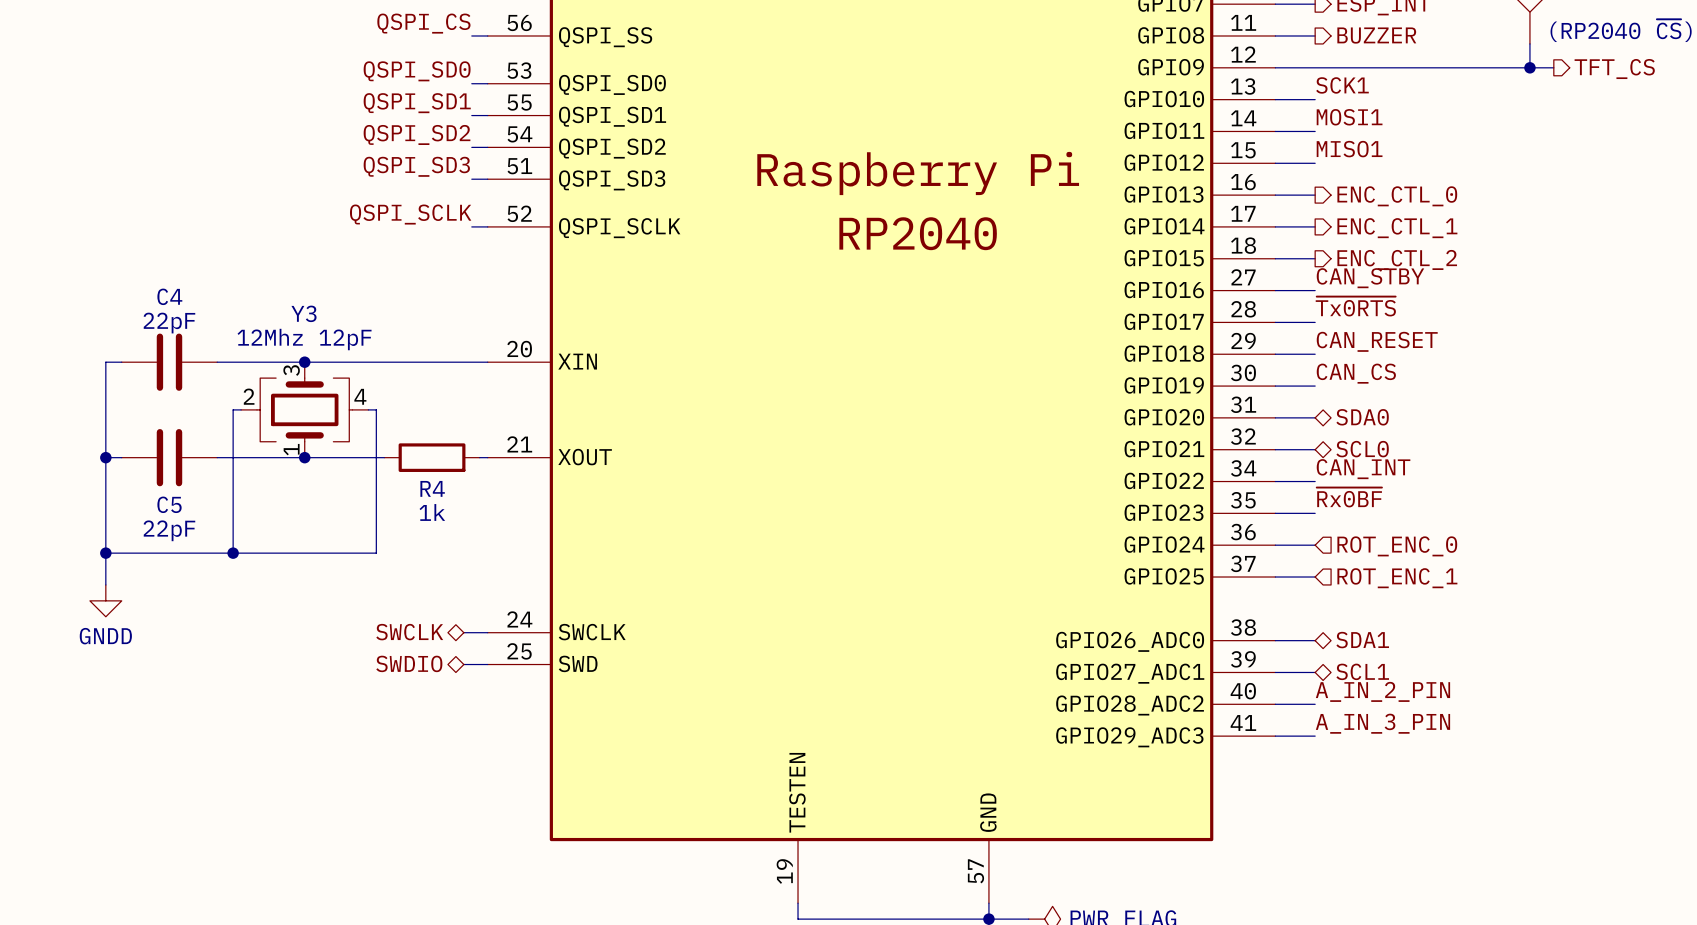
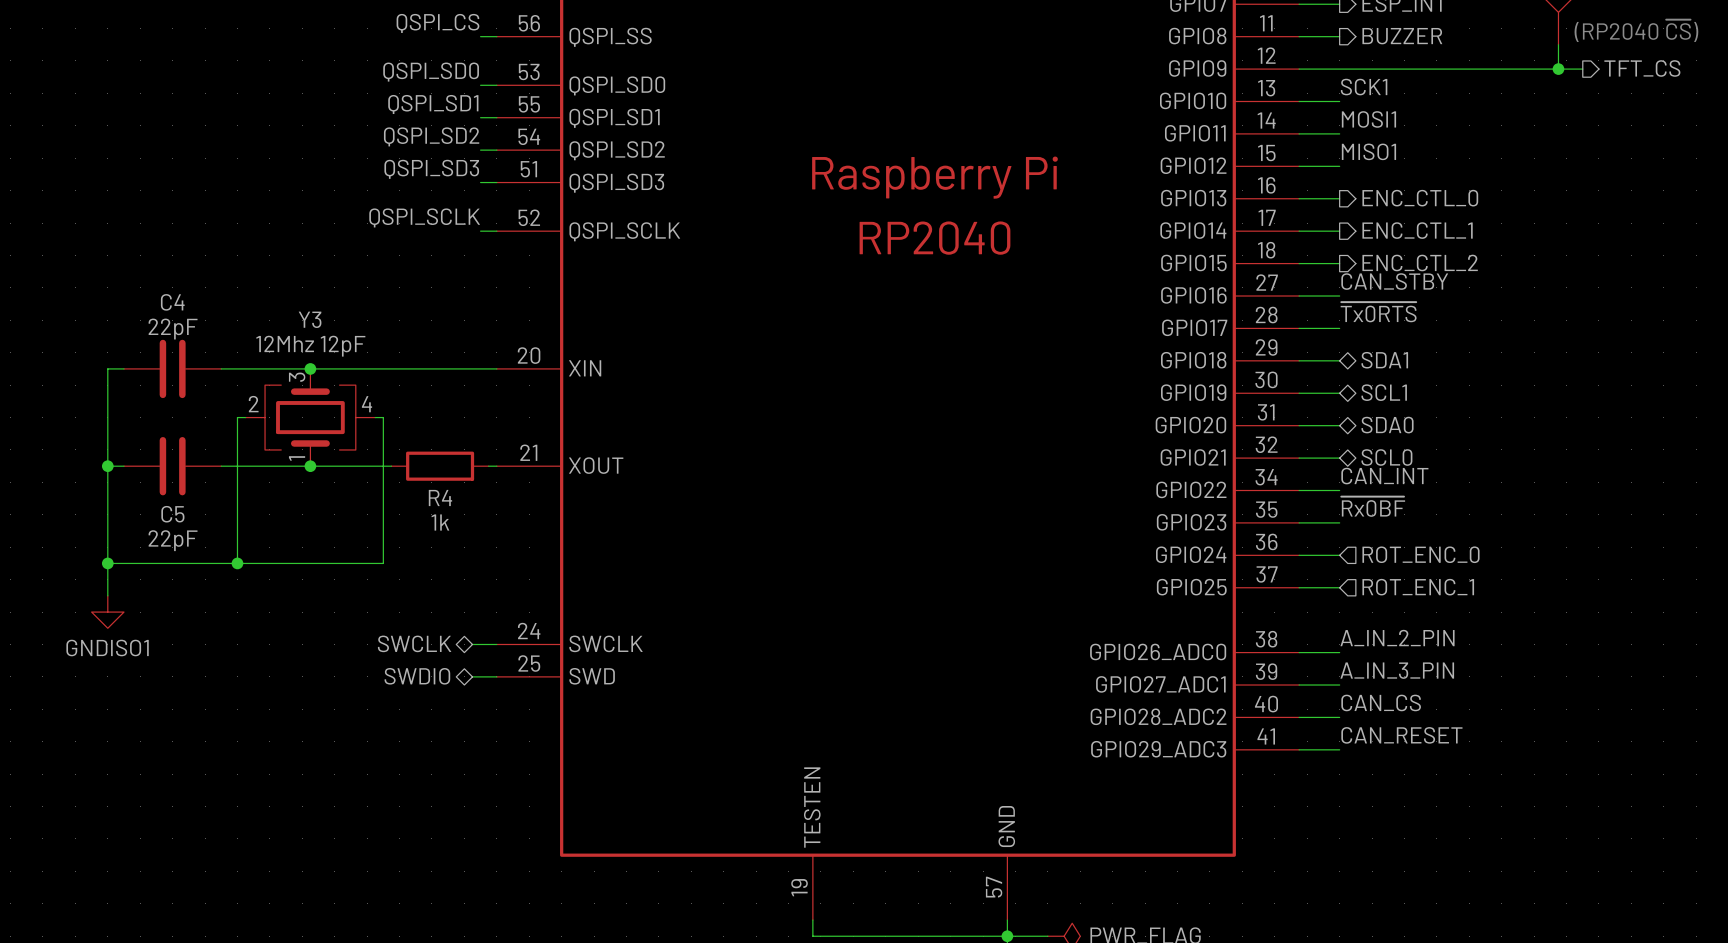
label: CAN_RESET (1377, 341) -> none
label: CAN_CS (1356, 373) -> none
power symbol: GNDD (105, 600) -> GNDISO1 (107, 612)
label: none -> A_IN_2_PIN (1397, 638)
hierarchical label position: SDA1 (1362, 640) -> SDA1 (1384, 360)
label: none -> A_IN_3_PIN (1397, 670)
hierarchical label position: SCL1 (1362, 671) -> SCL1 (1384, 392)
label: A_IN_2_PIN (1382, 691) -> CAN_CS (1381, 702)
label: A_IN_3_PIN (1382, 723) -> CAN_RESET (1401, 735)

